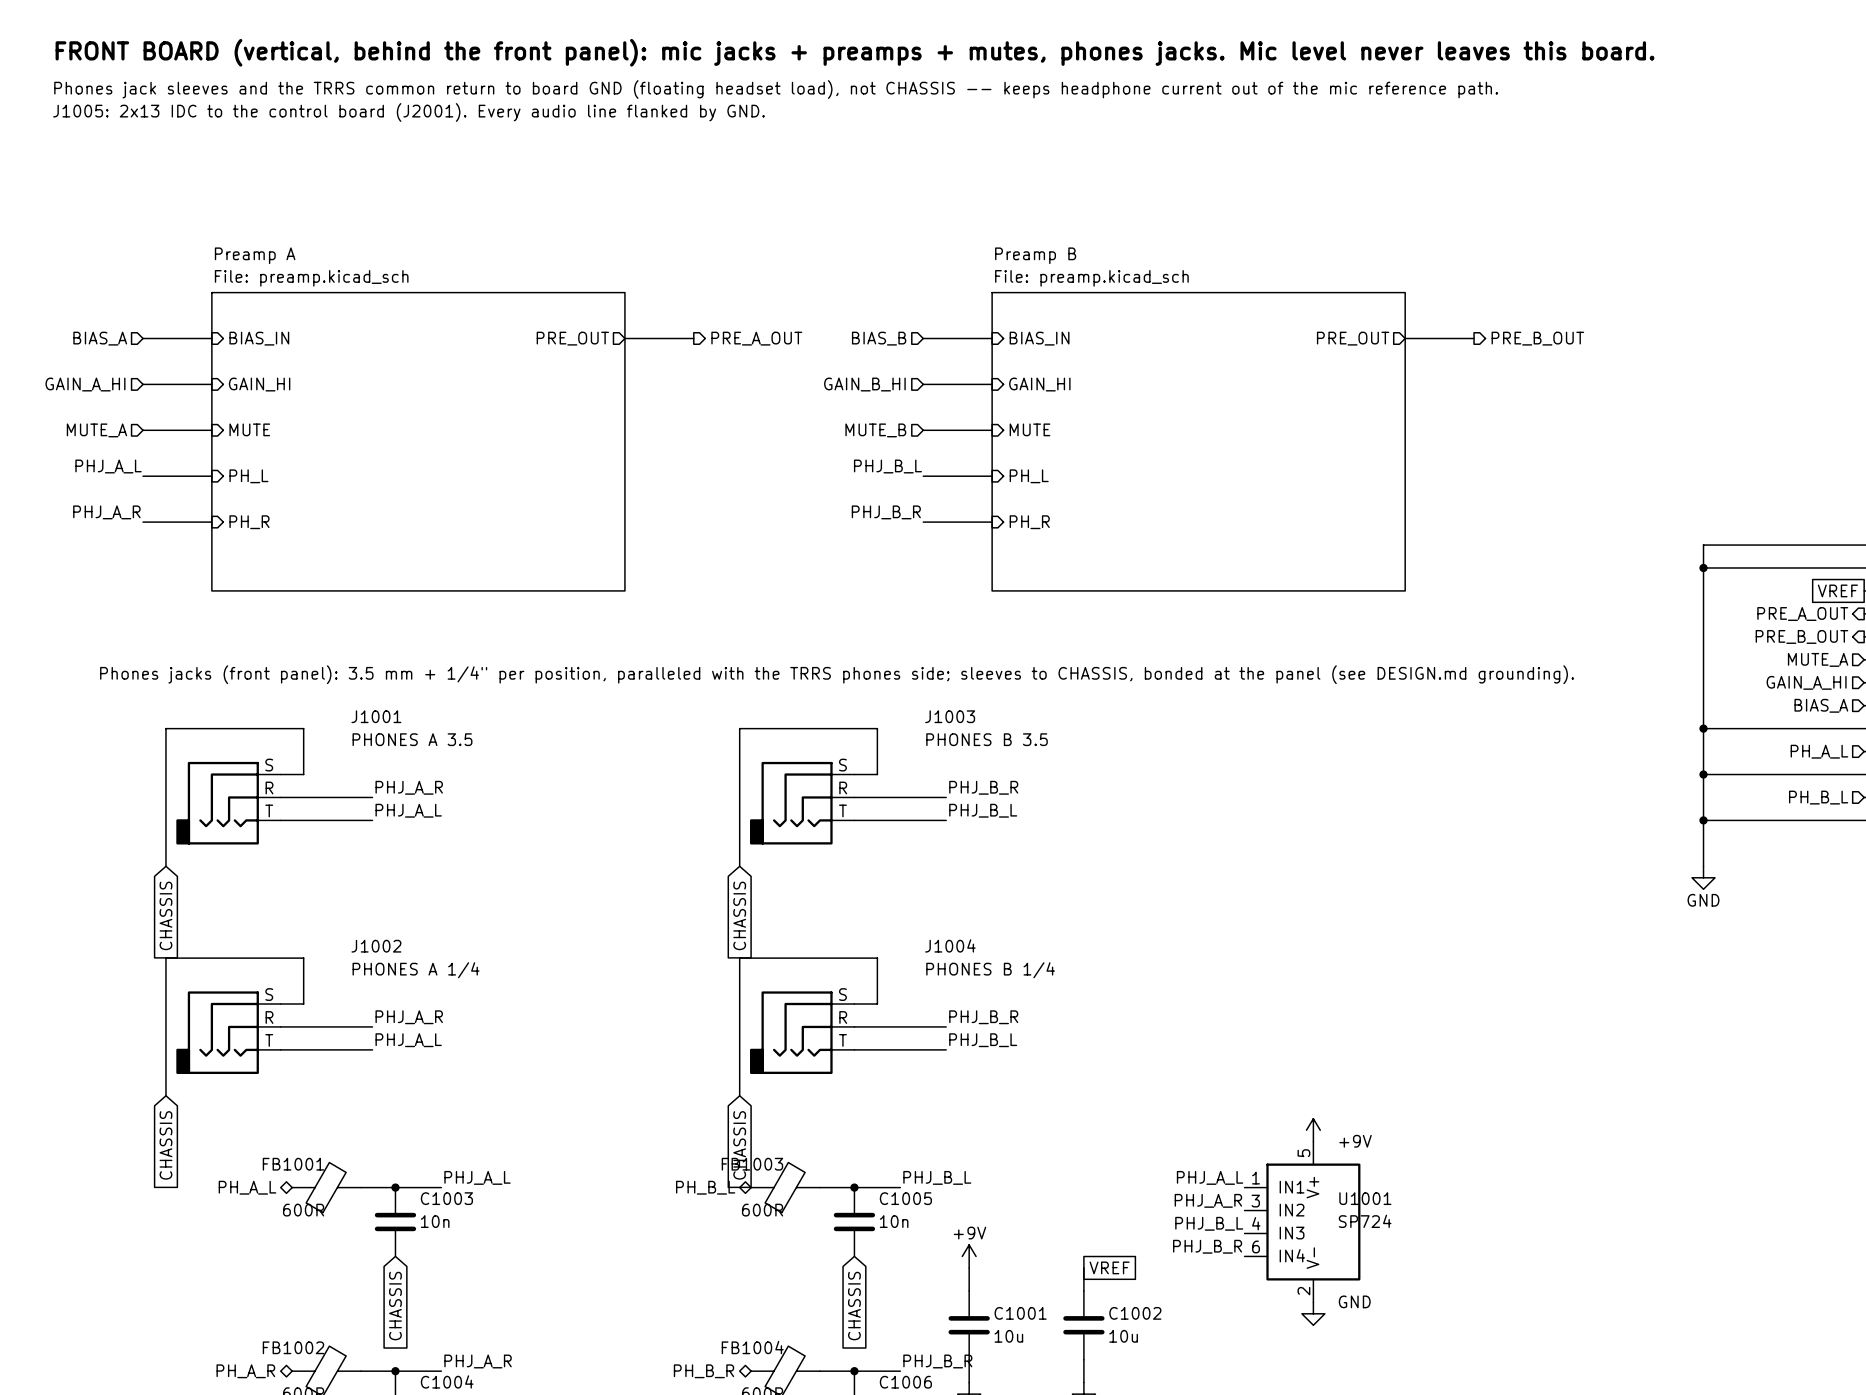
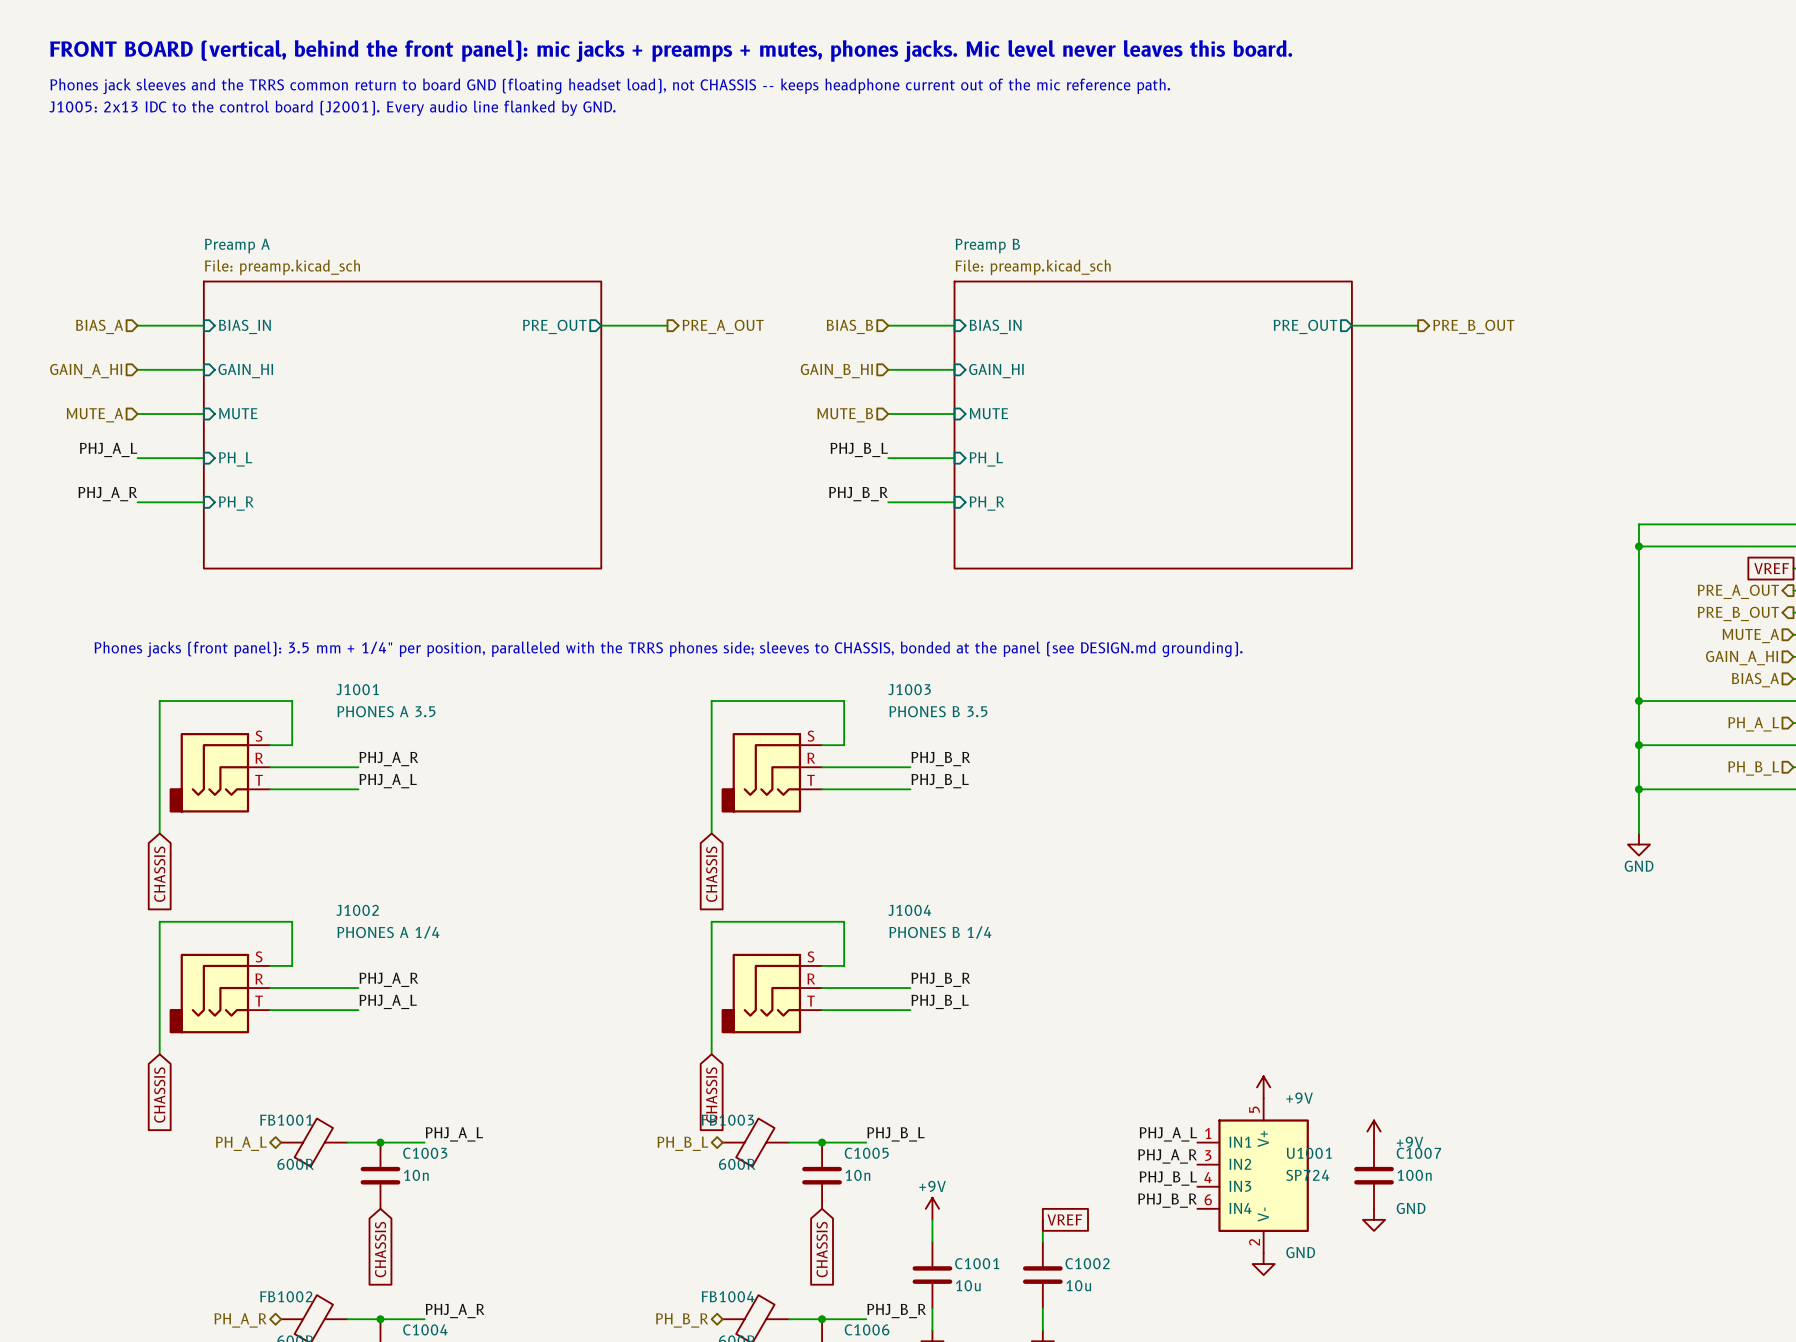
power symbol: none -> +9V (1374, 1131)
C1007: none -> 100n (1374, 1175)
power symbol: none -> GND (1374, 1219)

